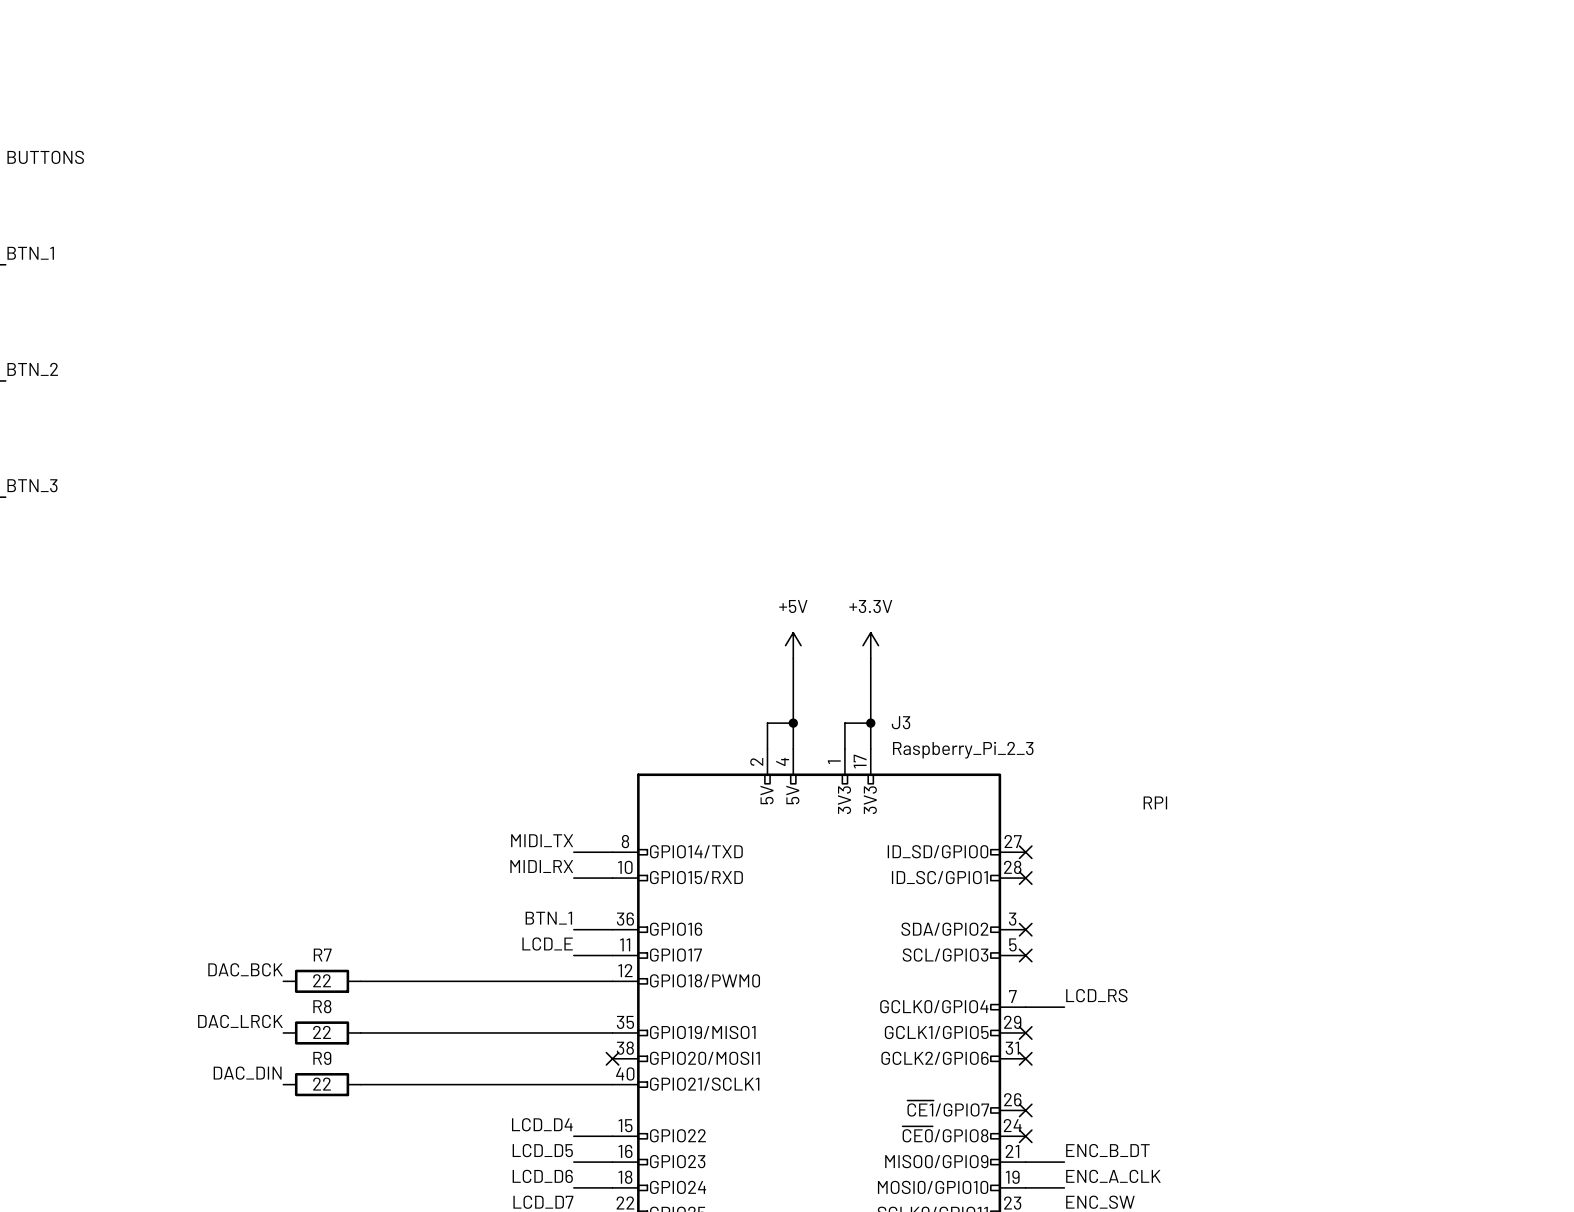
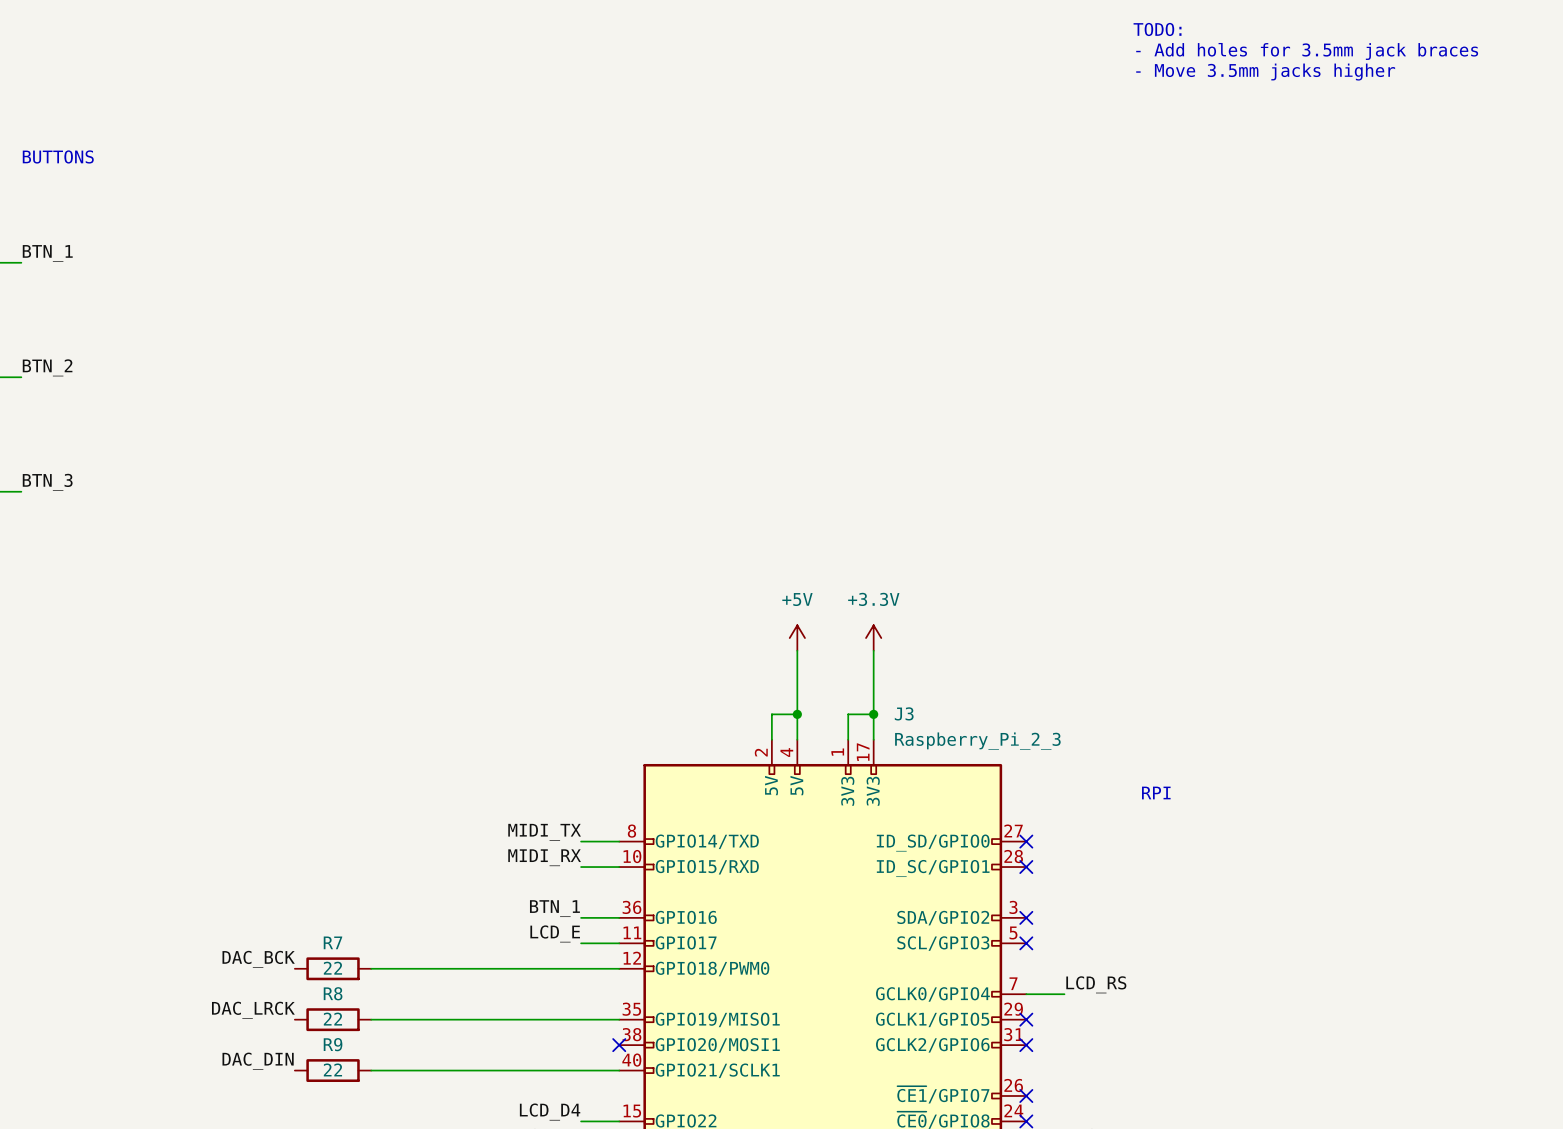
text: none -> TODO: (1157, 29)
text: none -> - Add holes for 3.5mm jack braces (1307, 51)
text: none -> - Move 3.5mm jacks higher (1265, 72)

